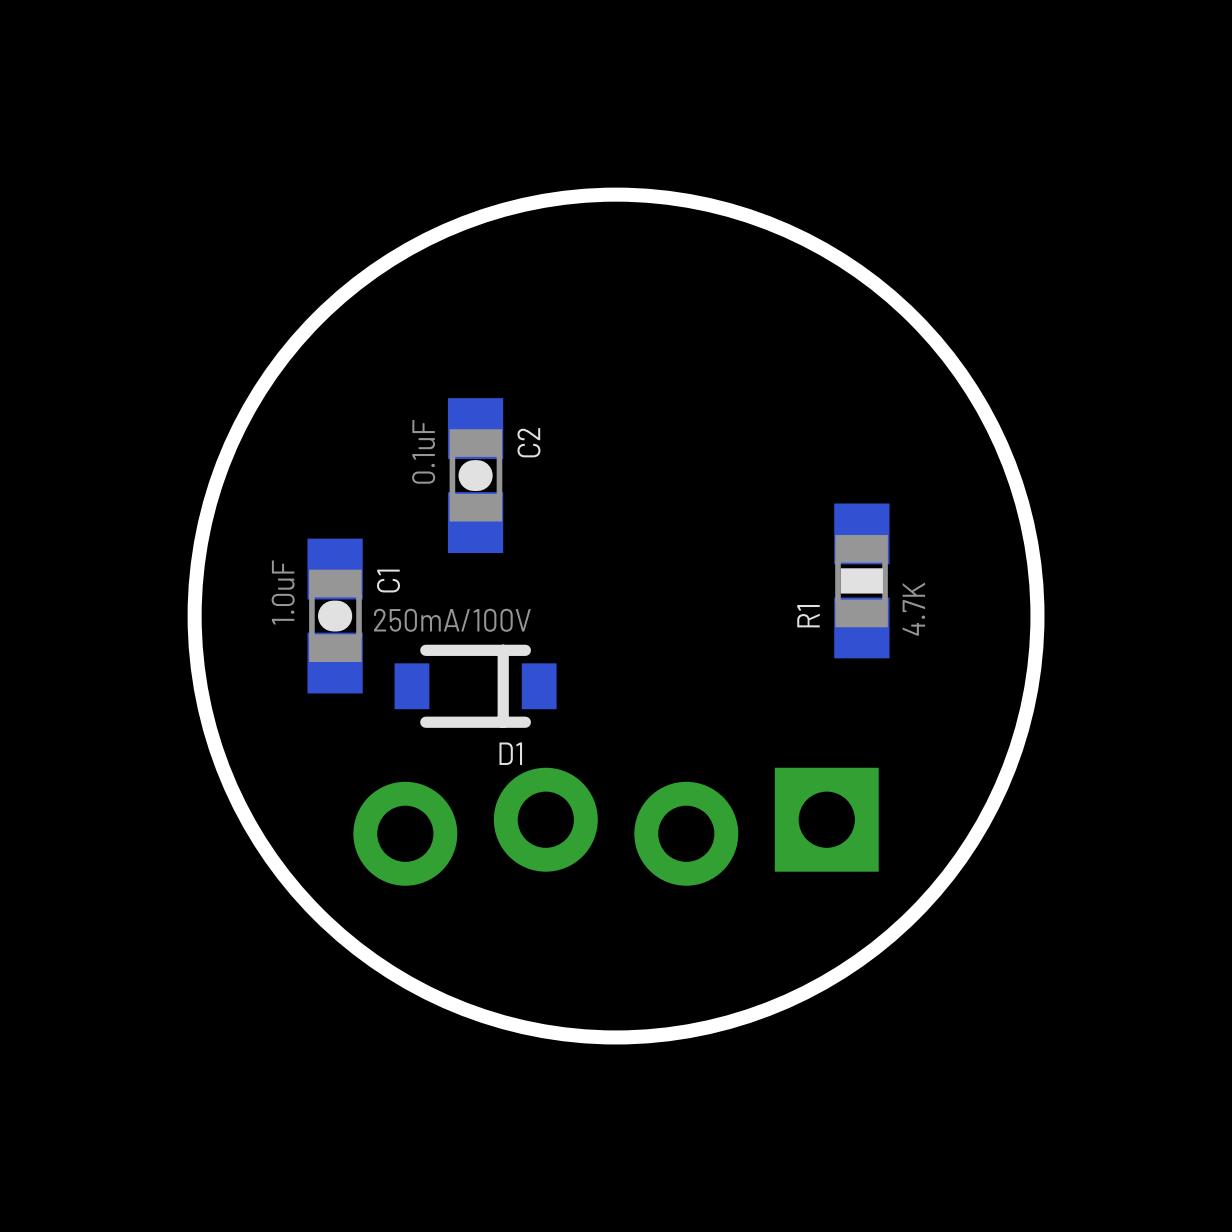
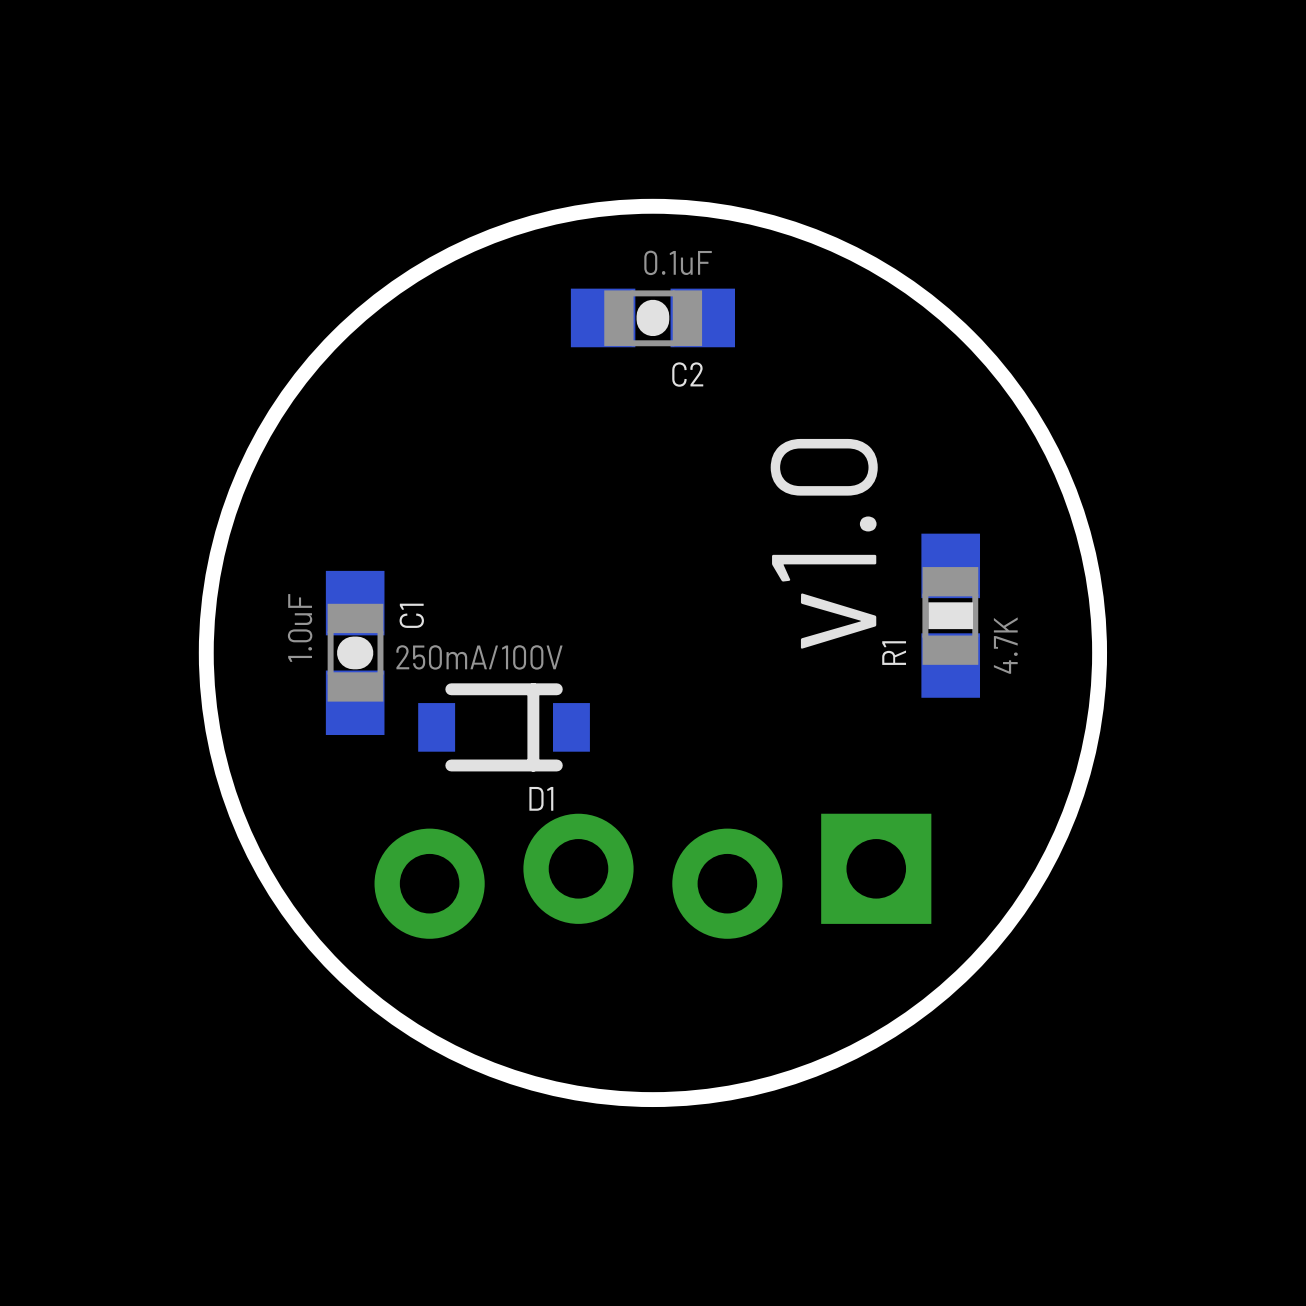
C2 rotation: 0° (475, 475) -> 90° clockwise (652, 317)
C2 position: (475, 475) -> (652, 317)
text: none -> v1.0 (824, 543)
R1 position: (861, 580) -> (950, 615)

